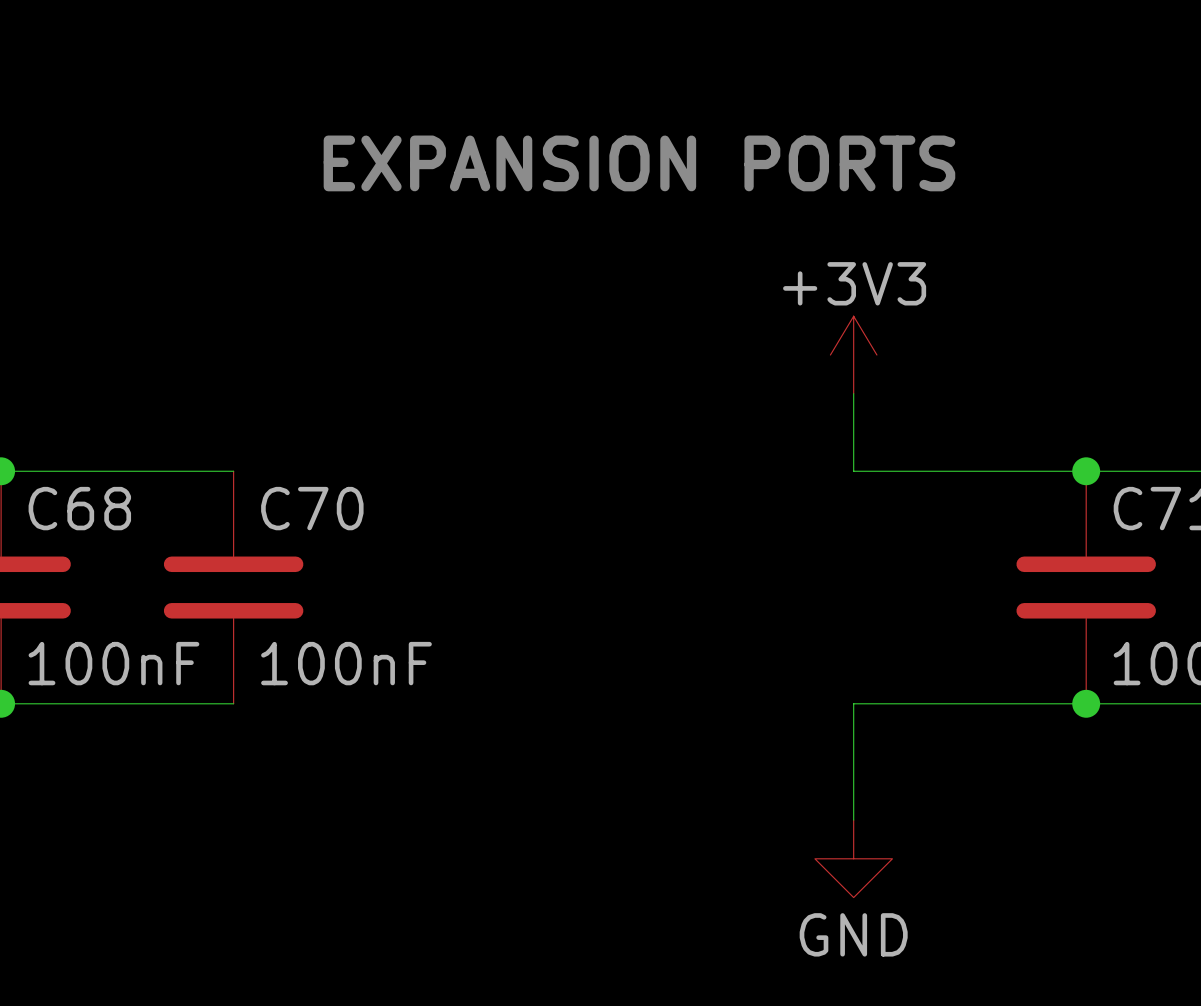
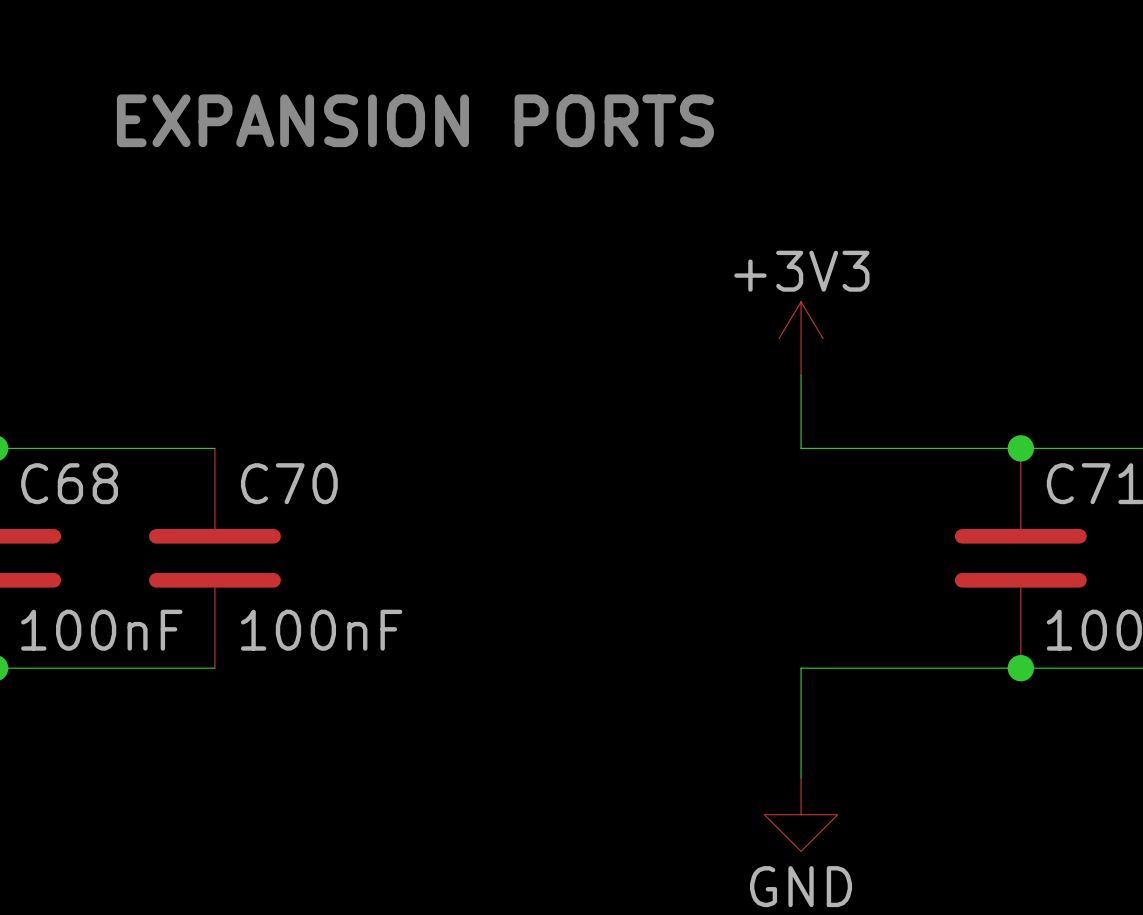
text position: EXPANSION PORTS (639, 163) -> EXPANSION PORTS (415, 120)

